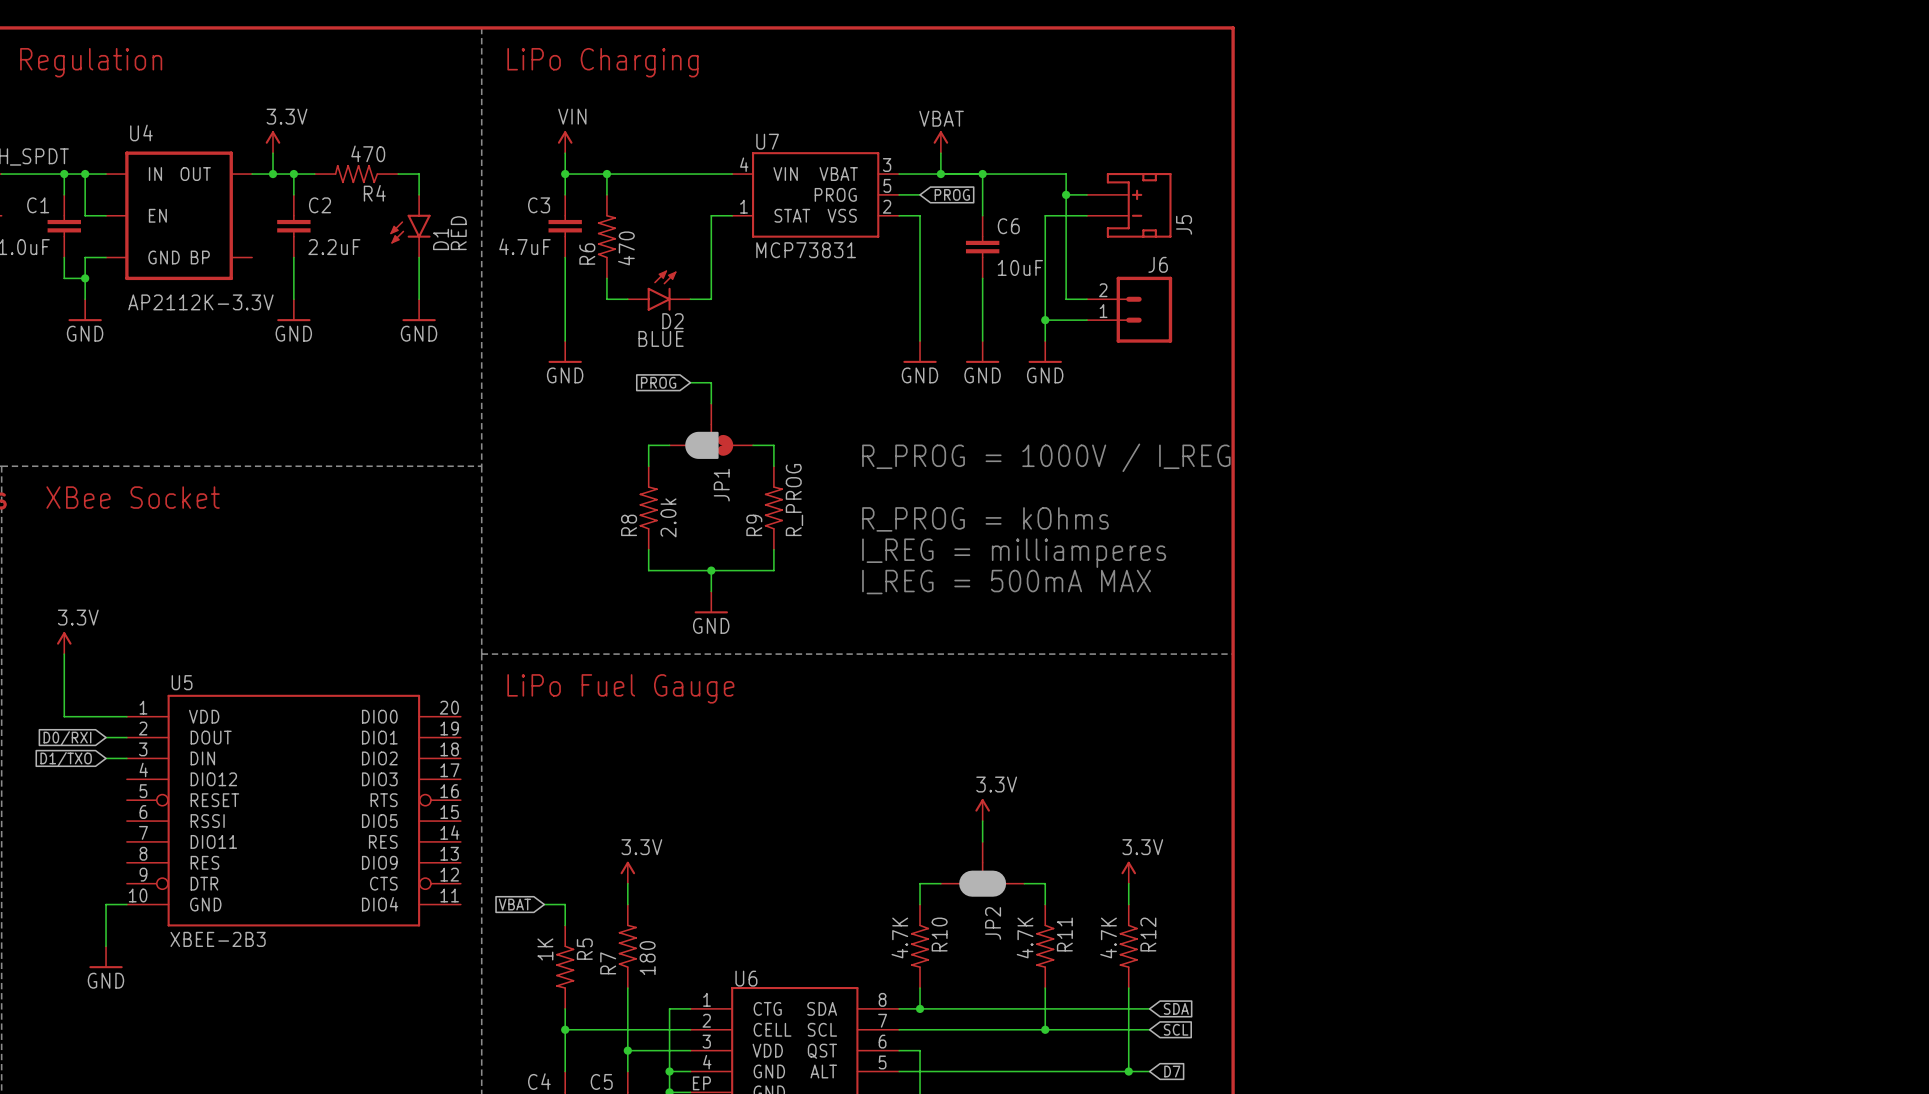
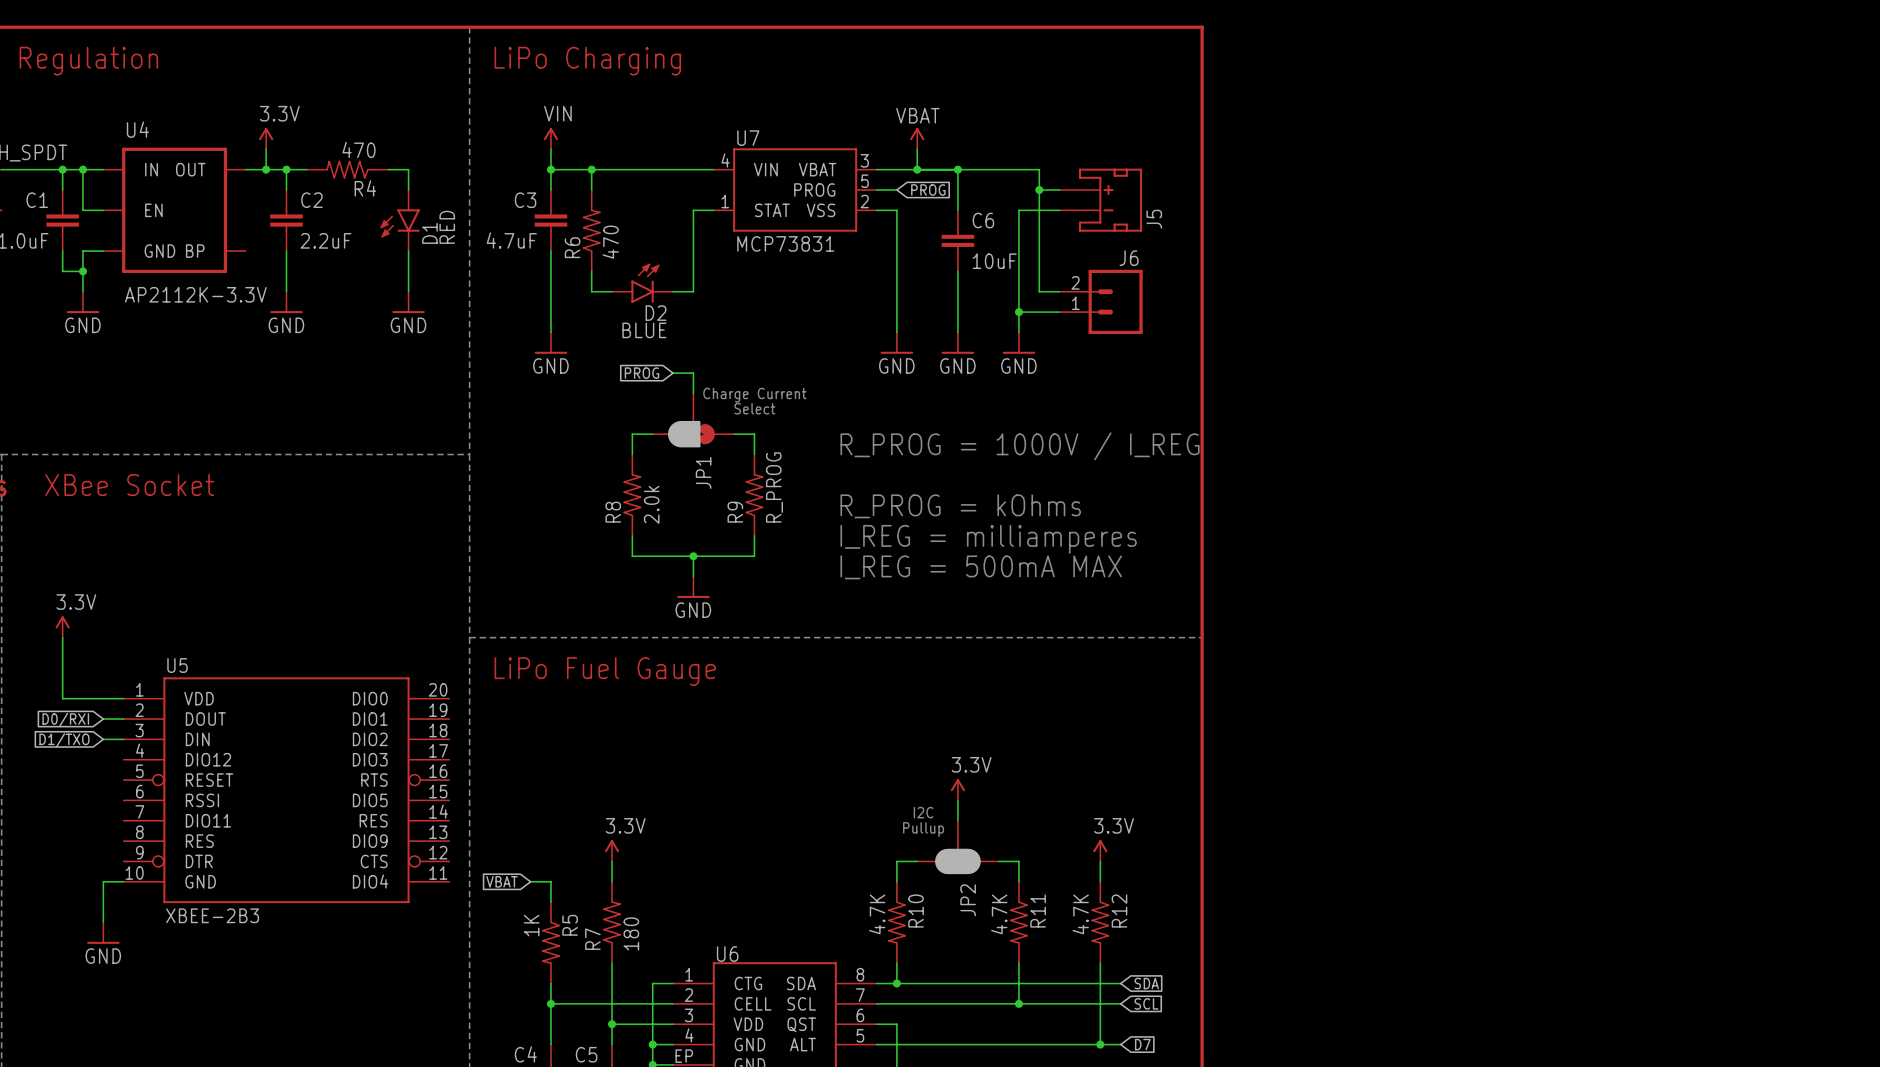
text: none -> Charge Current (754, 395)
text: none -> Select (754, 408)
text: none -> I2C (923, 812)
text: none -> Pullup (923, 829)

